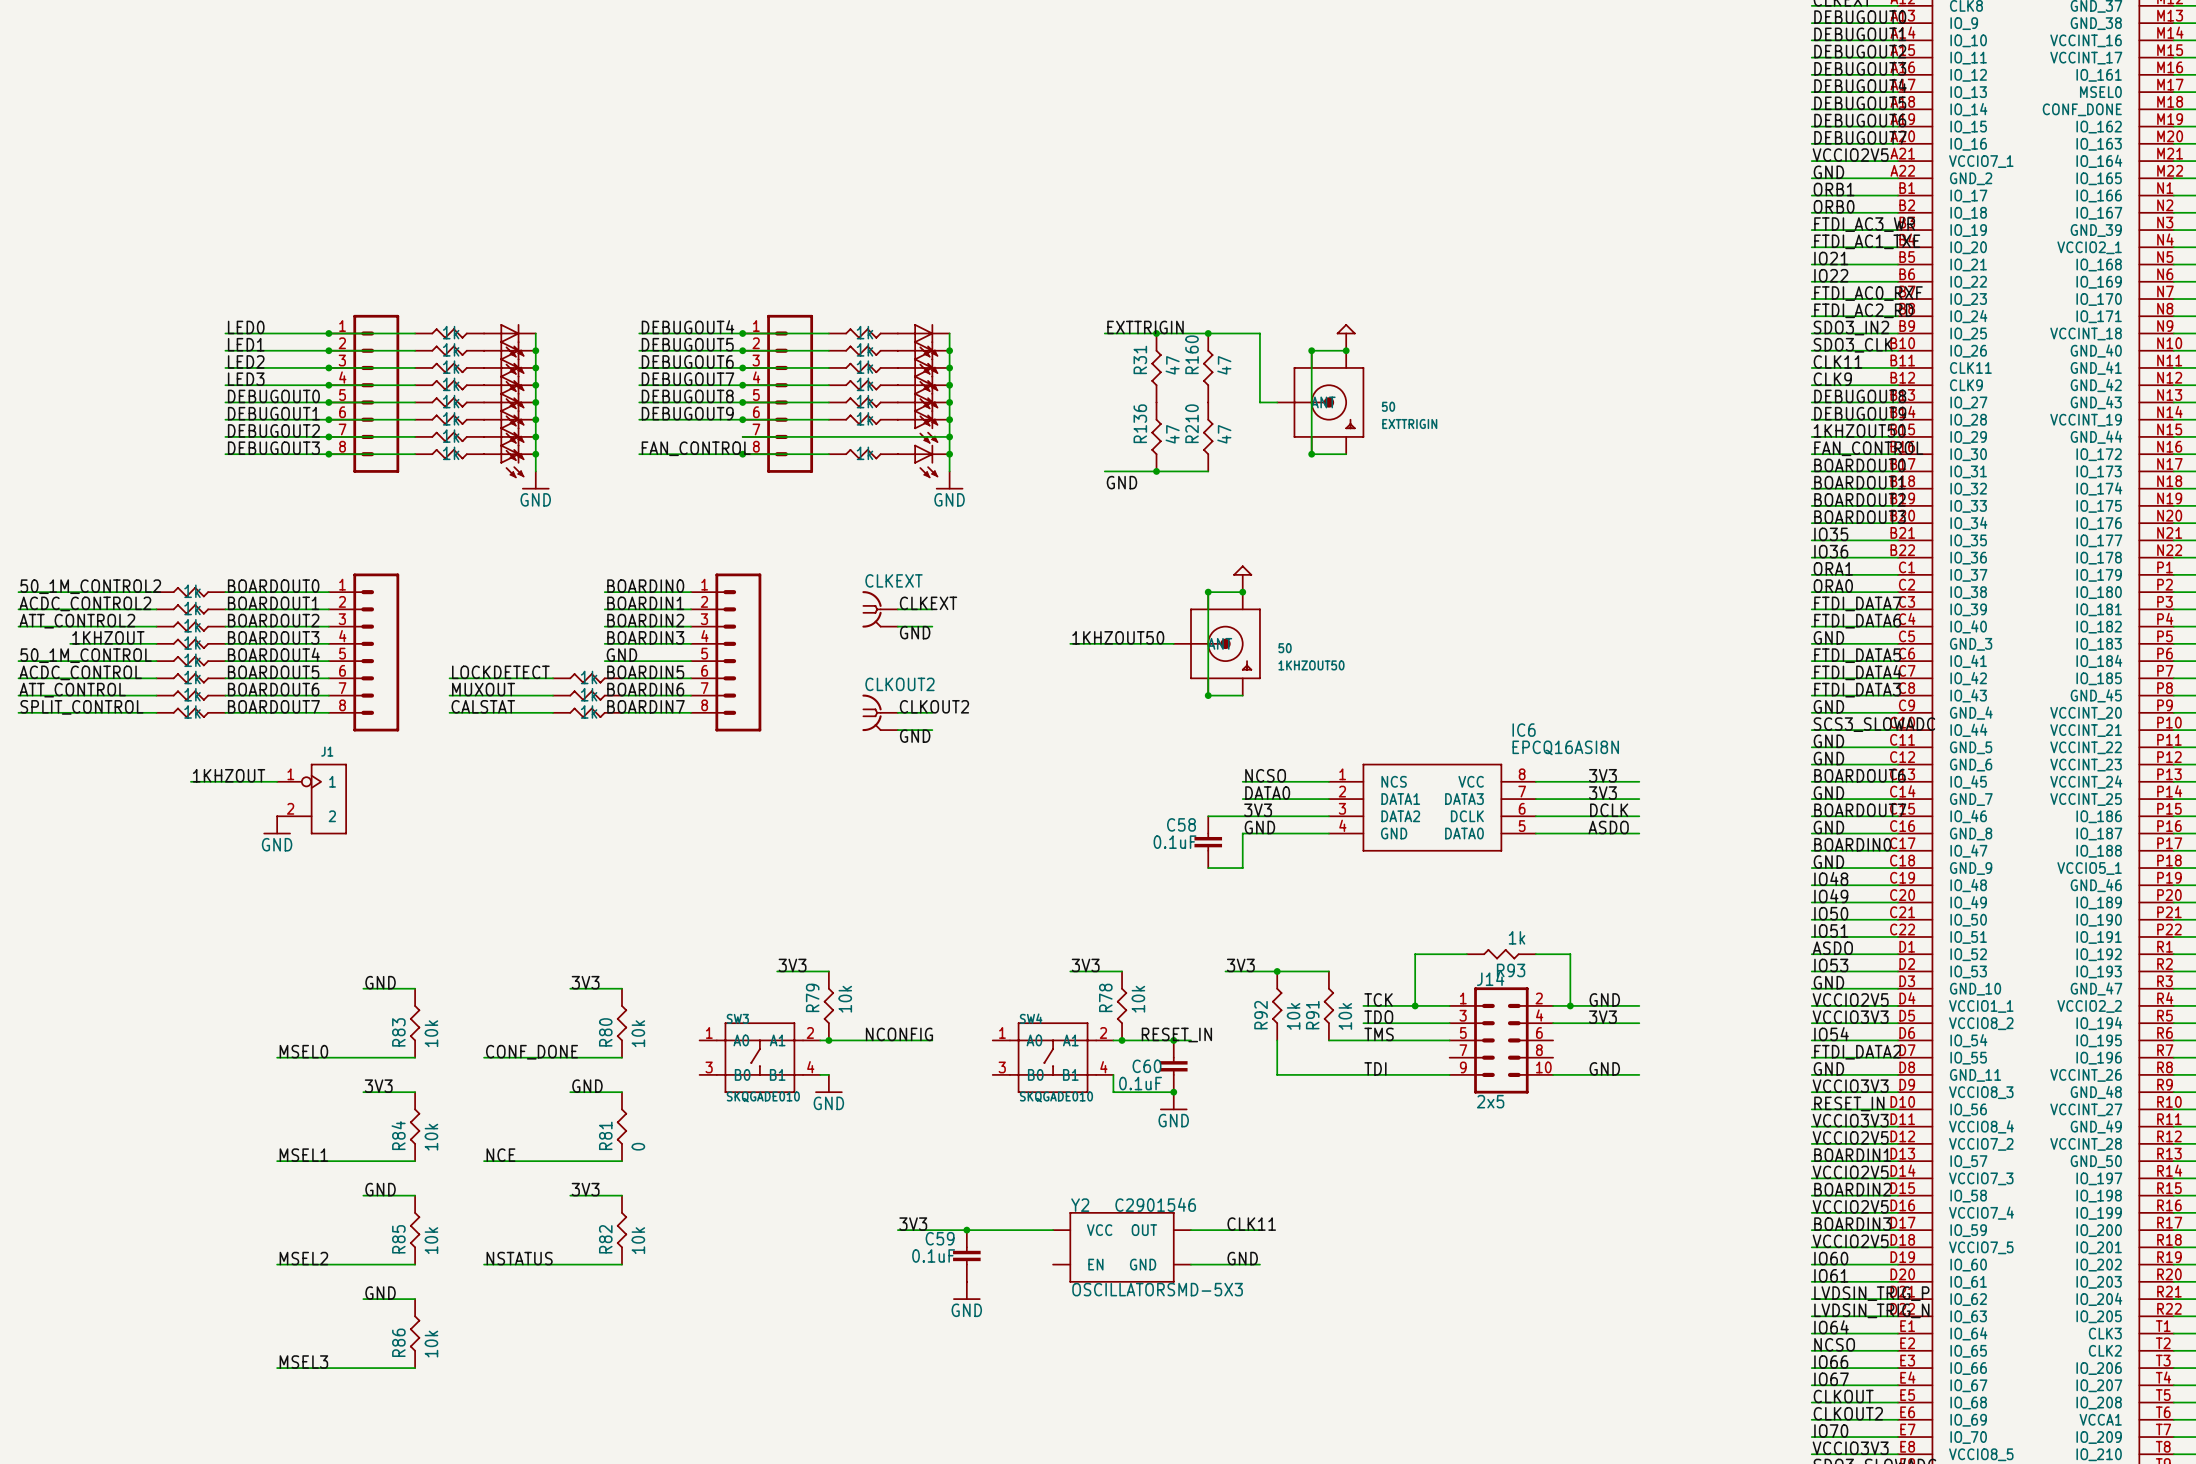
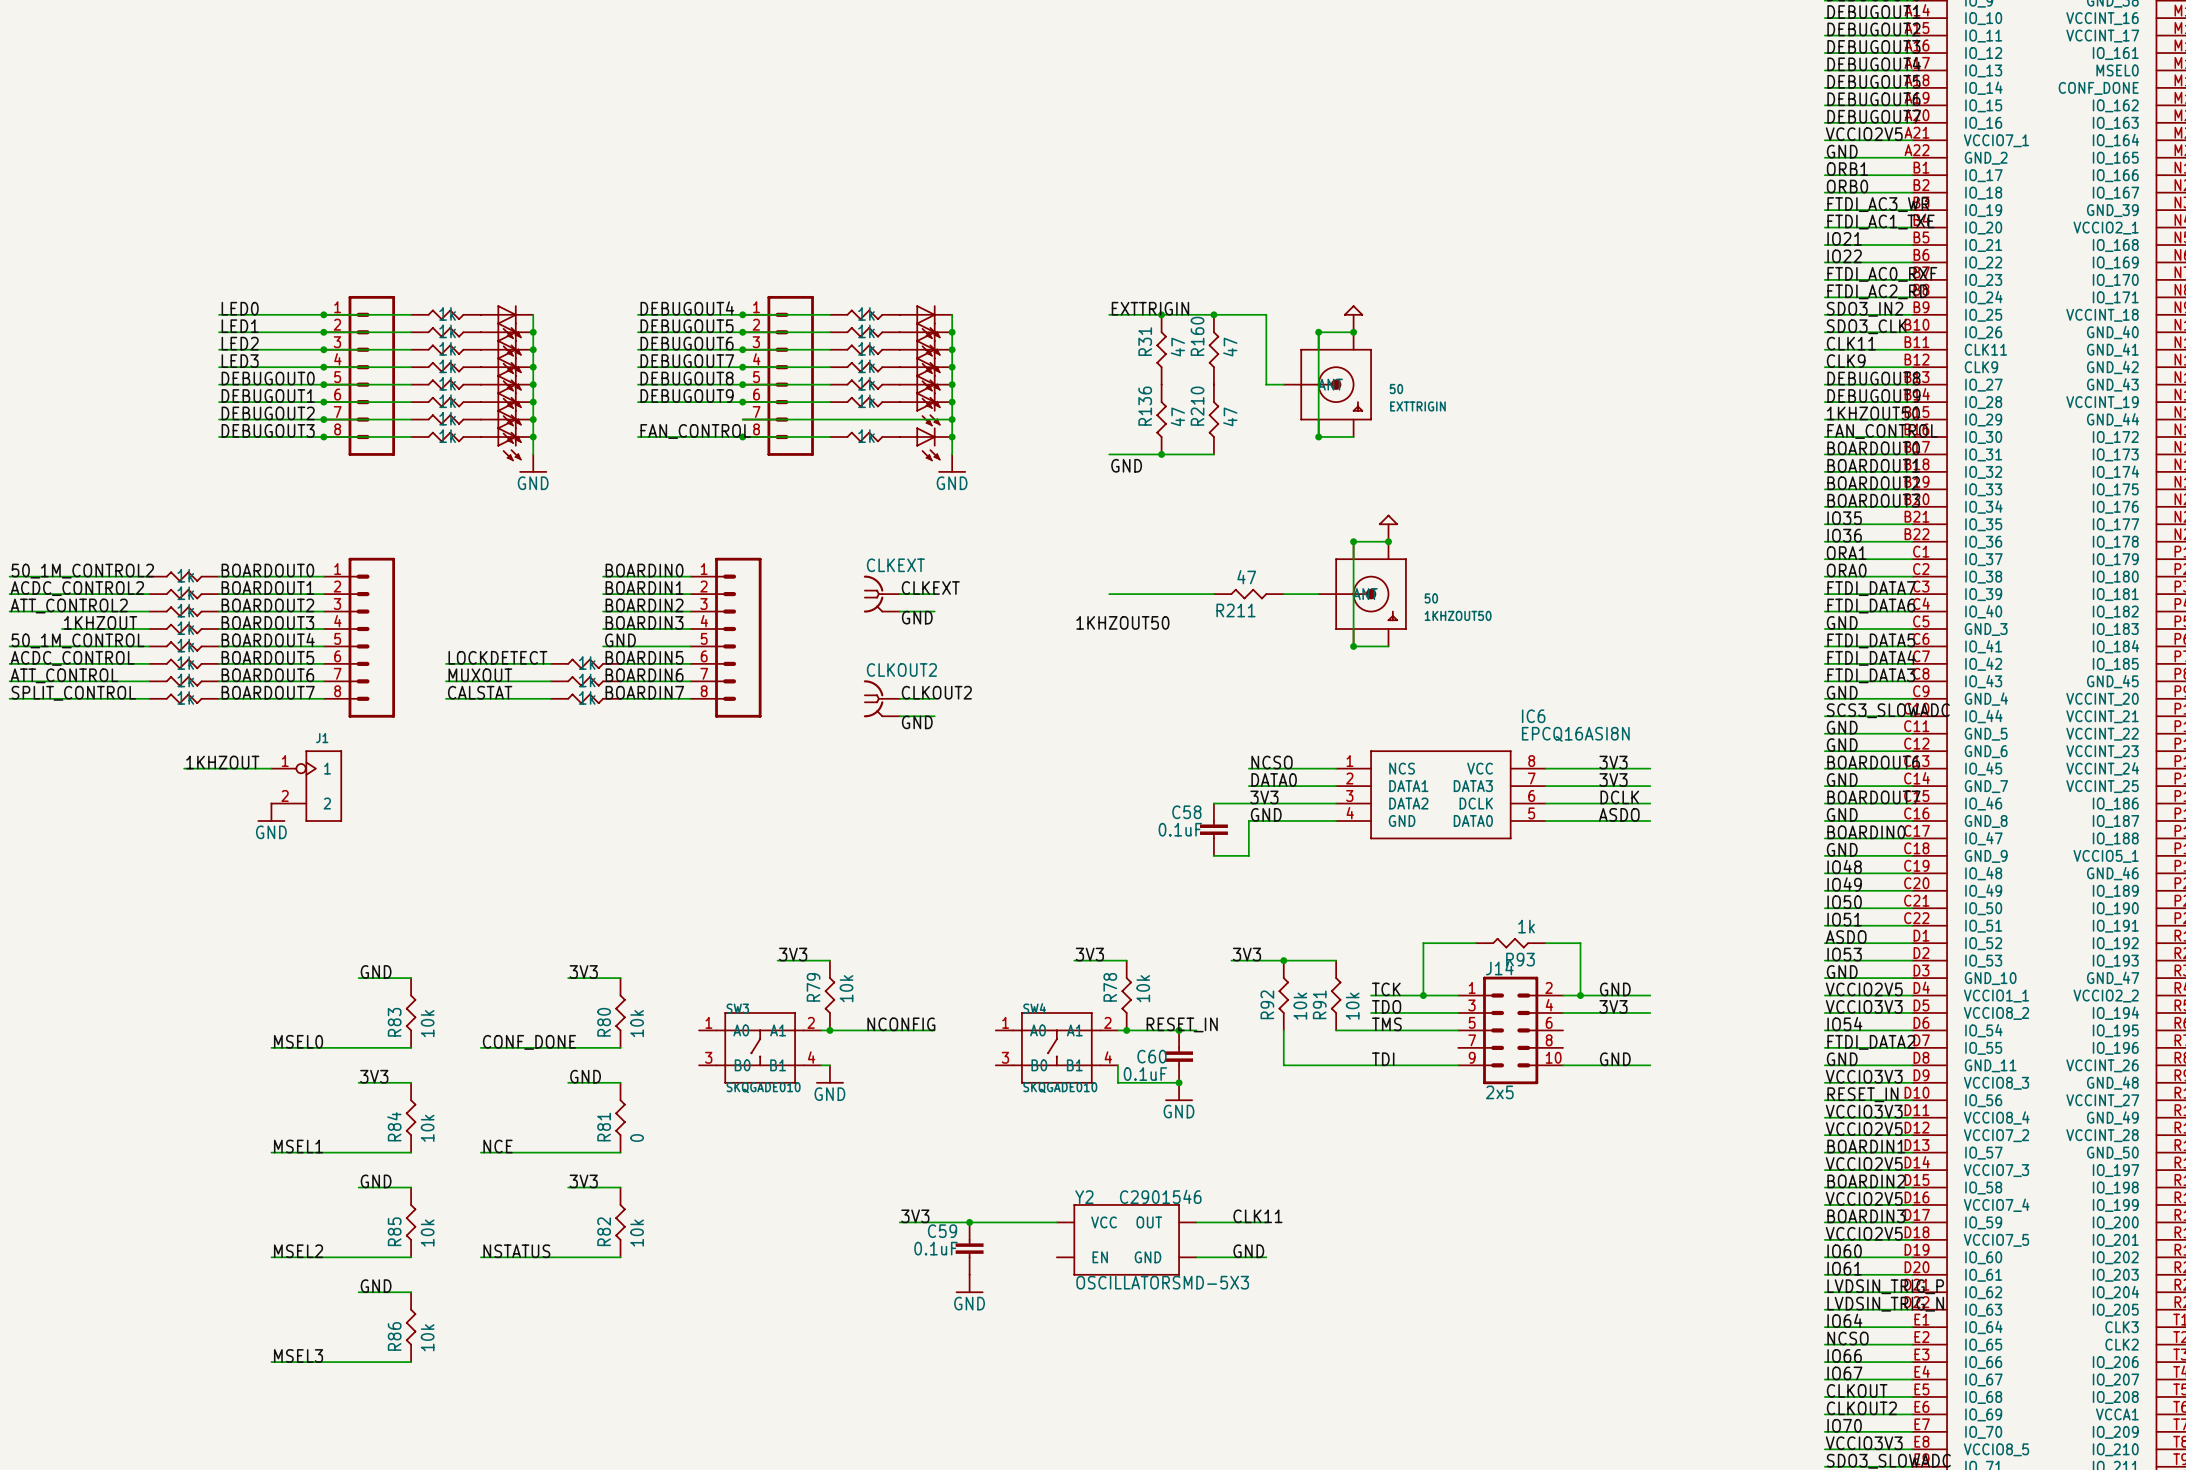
junction: none -> (1353, 541)
junction: none -> (1388, 541)
power symbol position: (1242, 578) -> (1388, 528)
junction: (1208, 592) -> none
wire: (1242, 592) (1208, 592) (1208, 695) (1242, 695) -> (1388, 541) (1353, 541) (1353, 646) (1388, 646)
junction: (1242, 592) -> none
R211: none -> 47 (1248, 594)
wire: none -> (1283, 594) (1318, 594)
wire: (1070, 643) (1173, 643) -> (1109, 594) (1213, 594)
1KHZOUT50 position: (1217, 643) -> (1362, 594)
junction: none -> (1353, 646)
junction: (1208, 695) -> none

